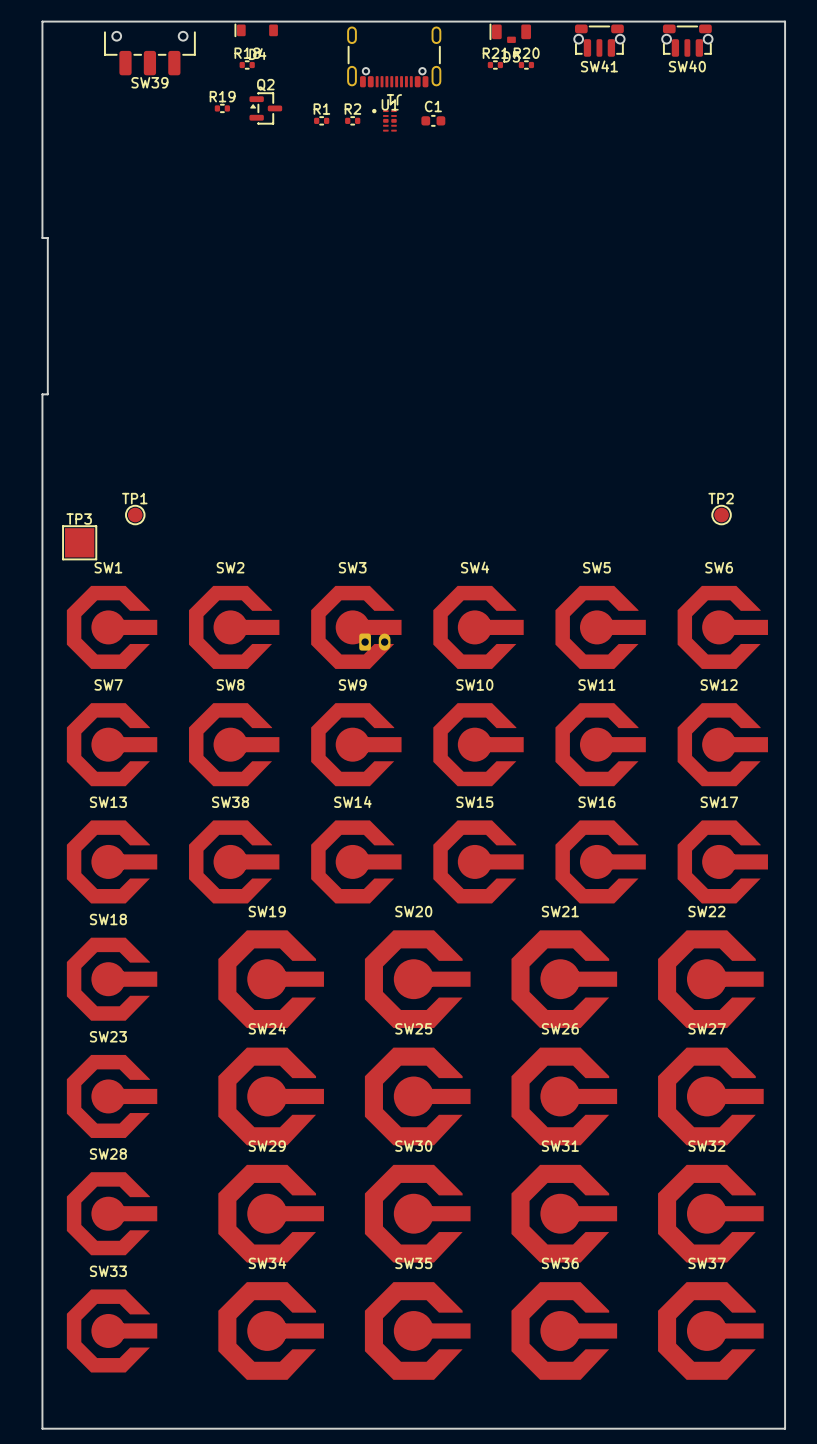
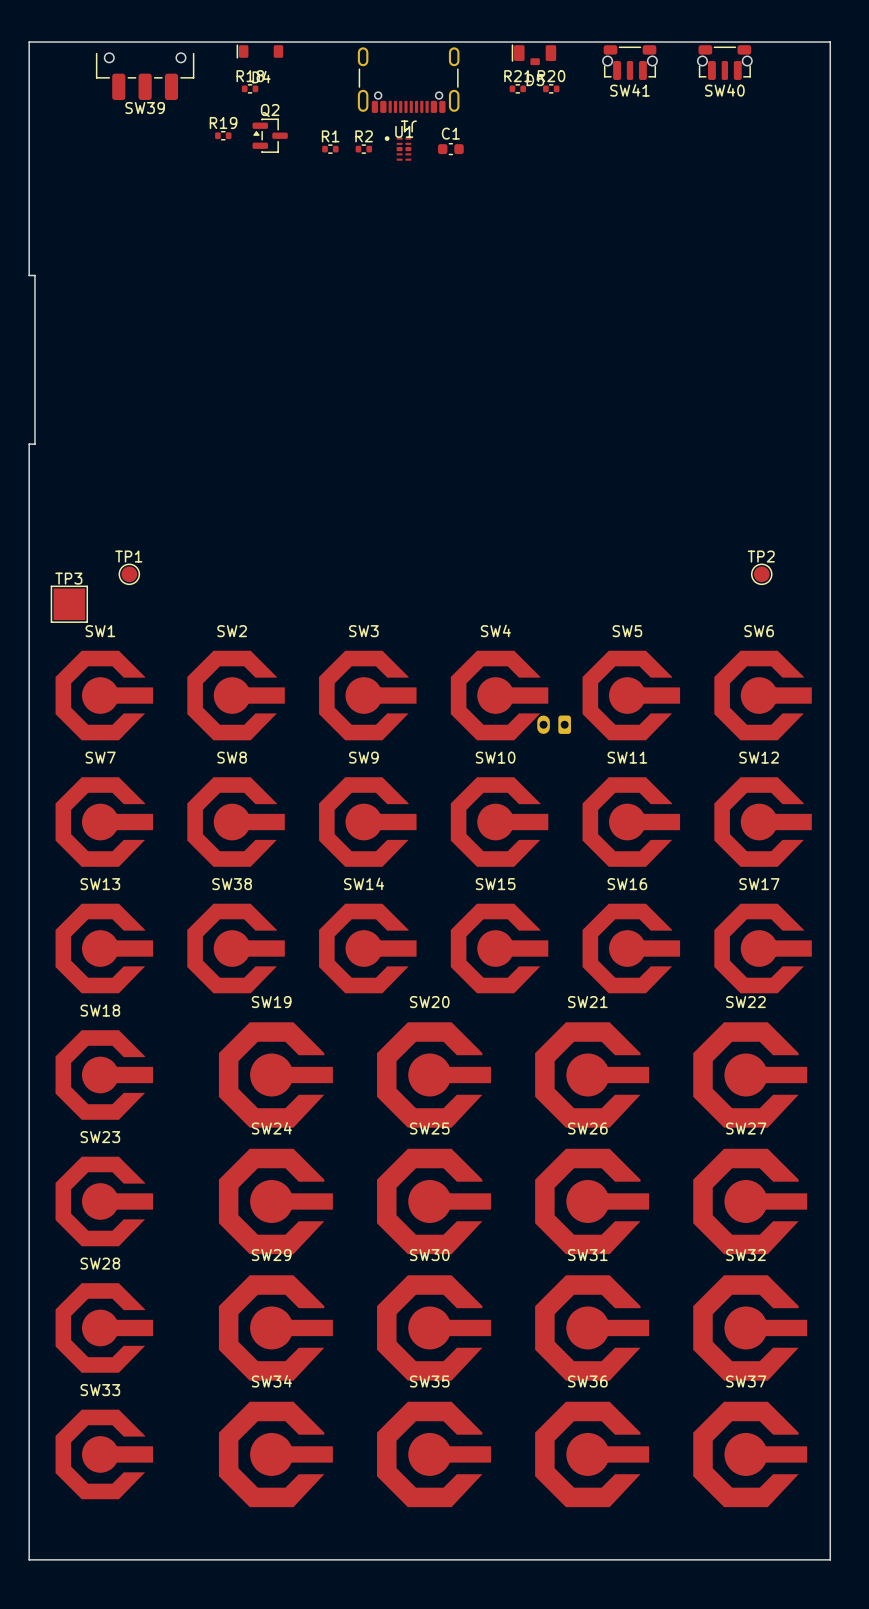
part rotation: 0° (374, 642) -> 180° (554, 724)
part position: (374, 642) -> (554, 724)

